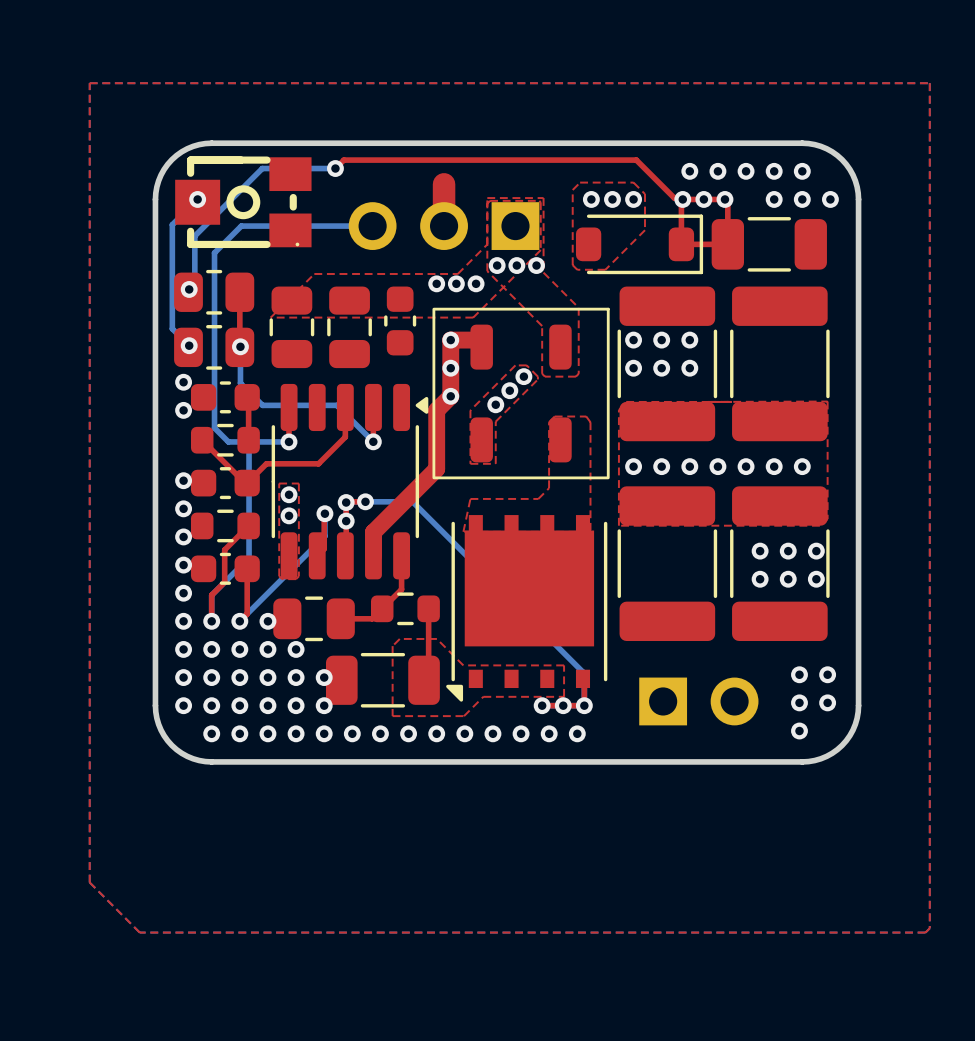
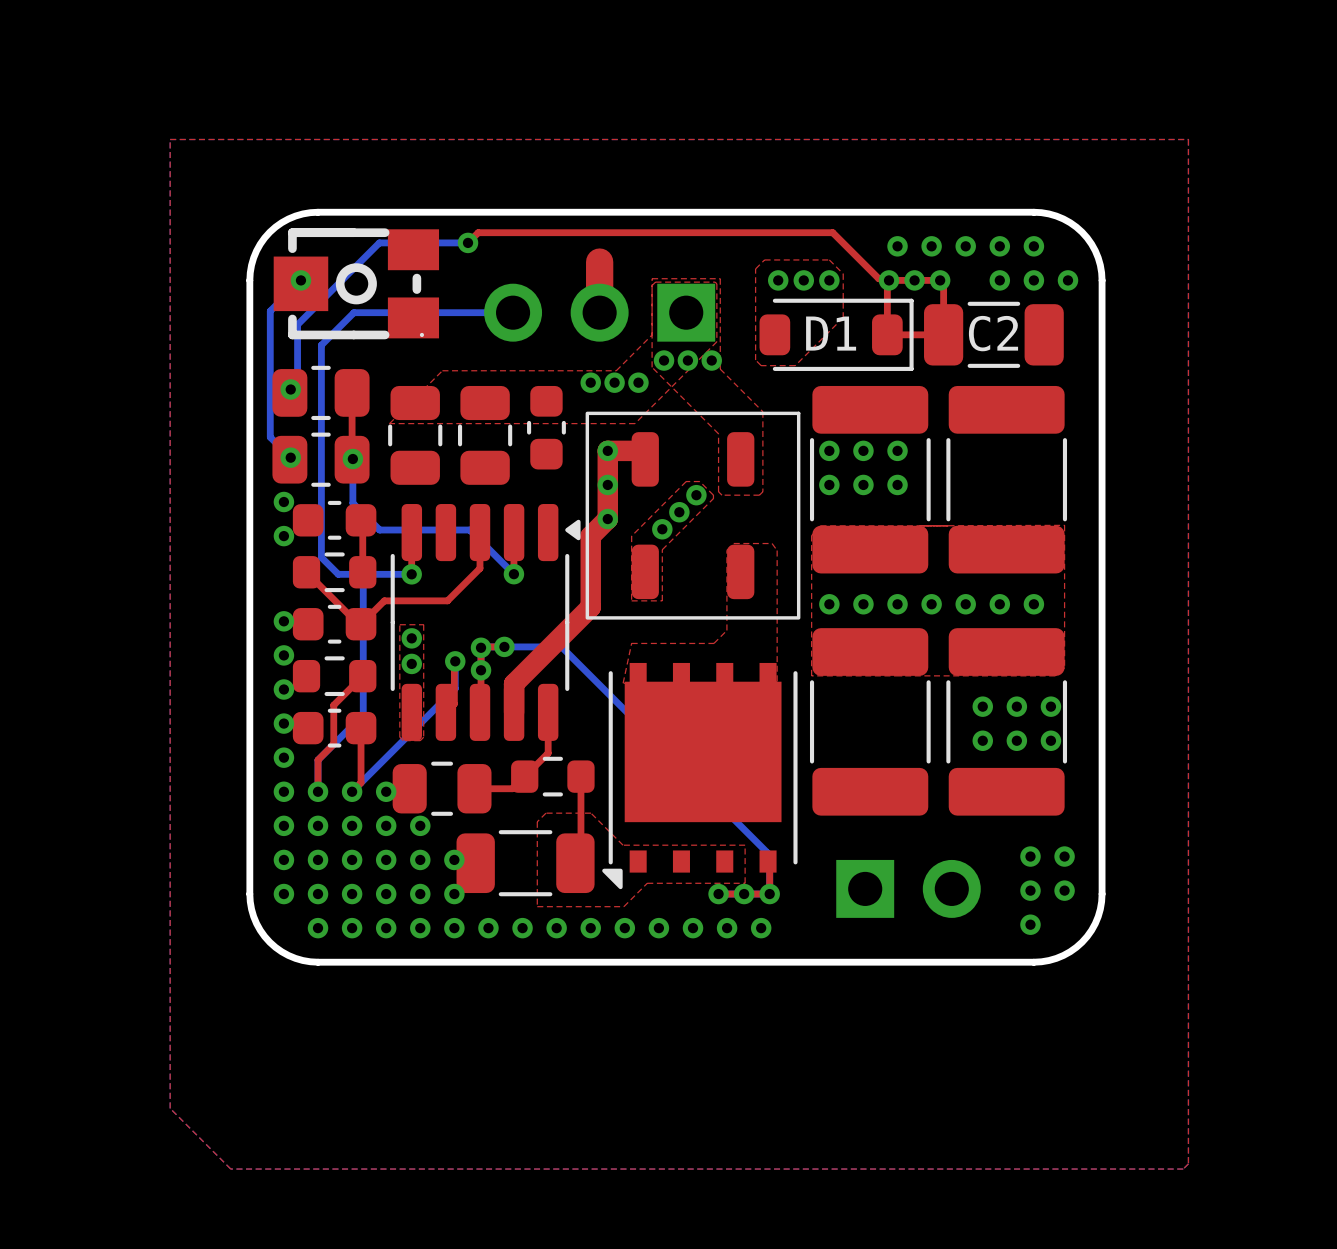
D1 name: none -> D1 (831, 333)
C2 name: none -> C2 (993, 333)

